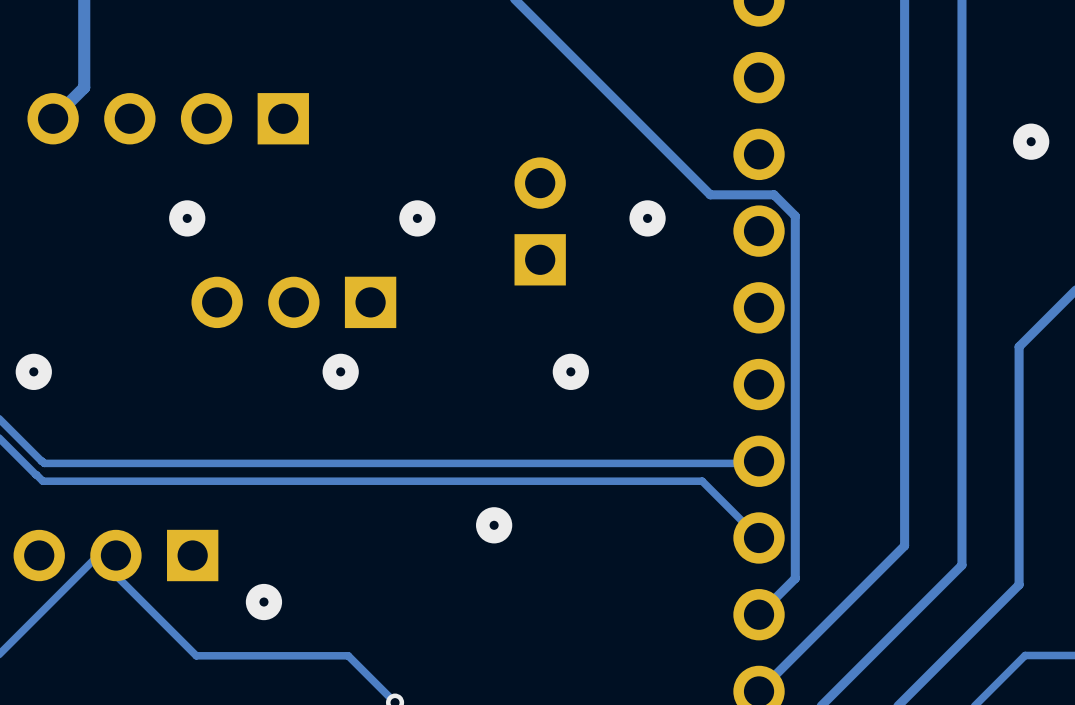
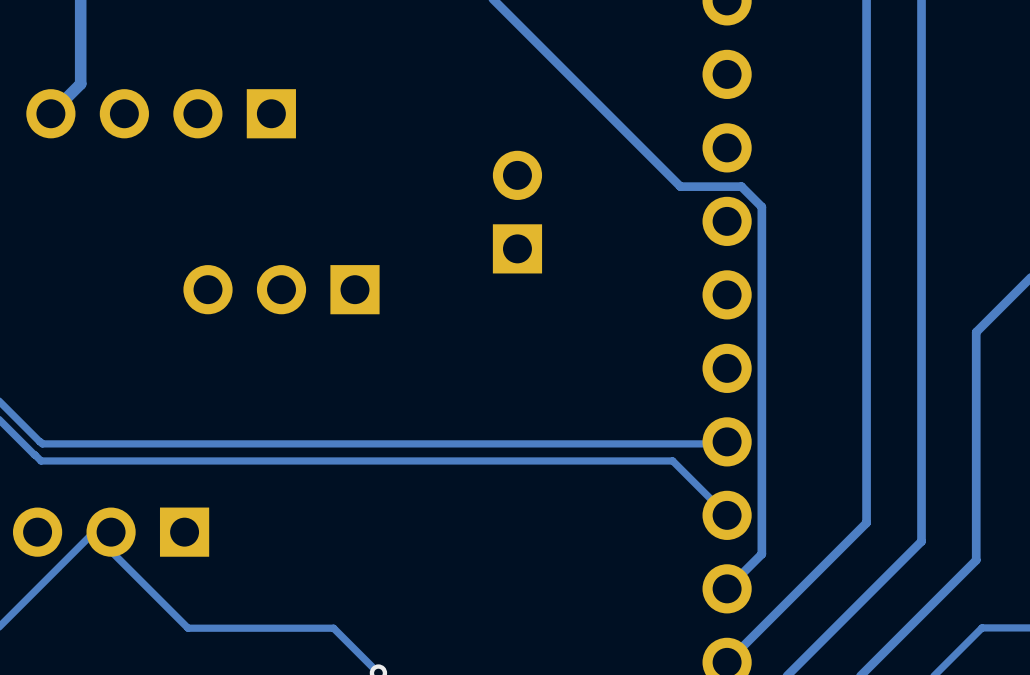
via: (1031, 141) -> none
via: (187, 218) -> none
via: (417, 218) -> none
via: (647, 218) -> none
via: (33, 371) -> none
via: (340, 371) -> none
via: (570, 371) -> none
via: (494, 525) -> none
via: (263, 602) -> none

